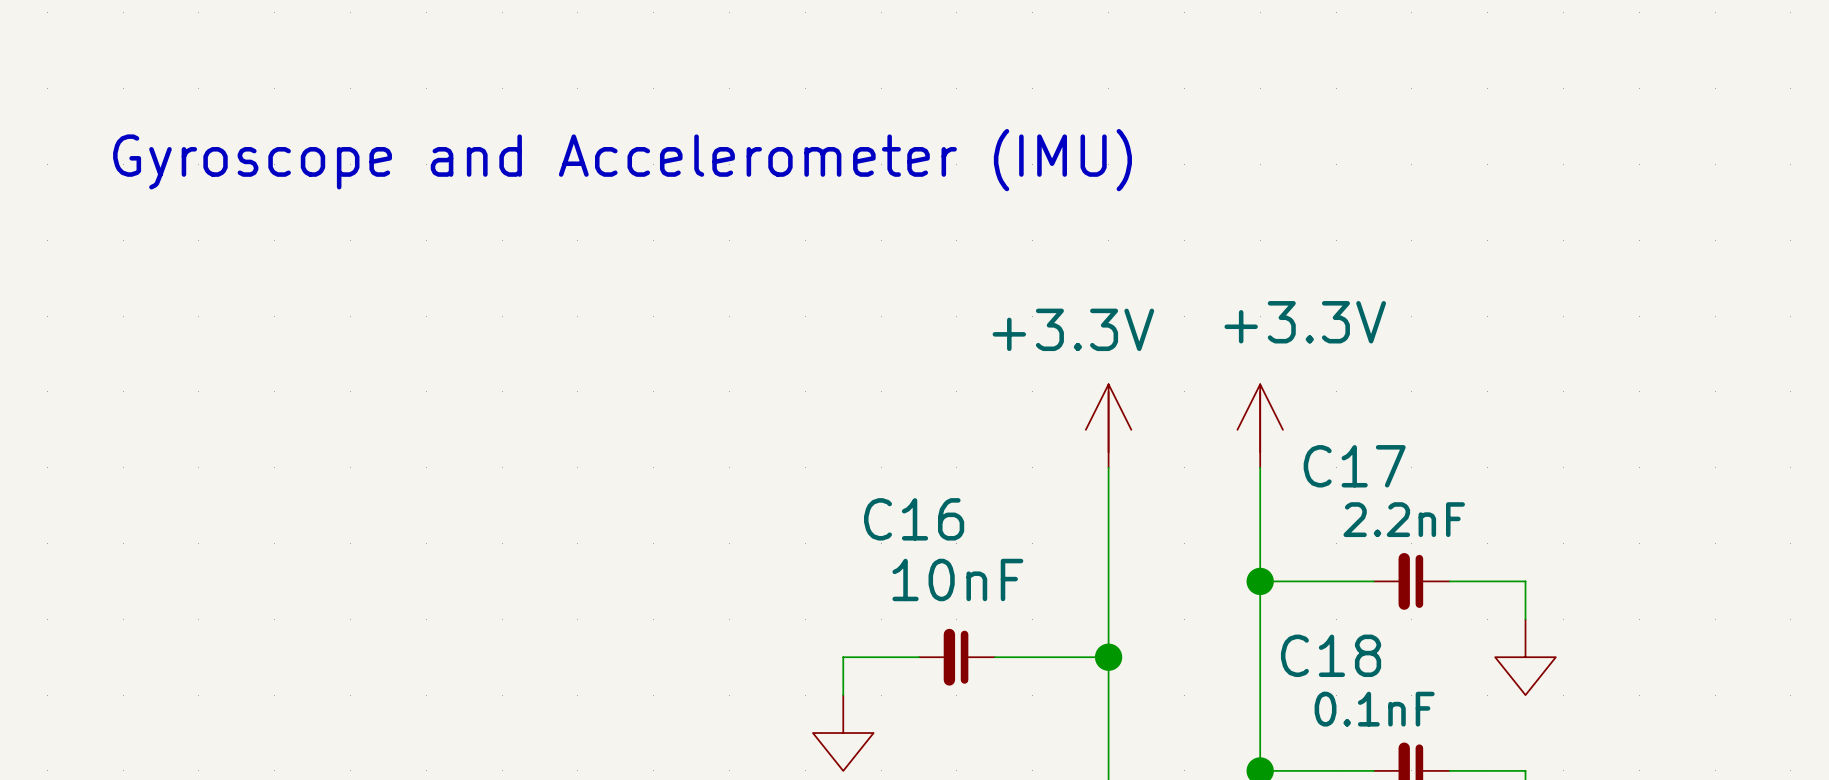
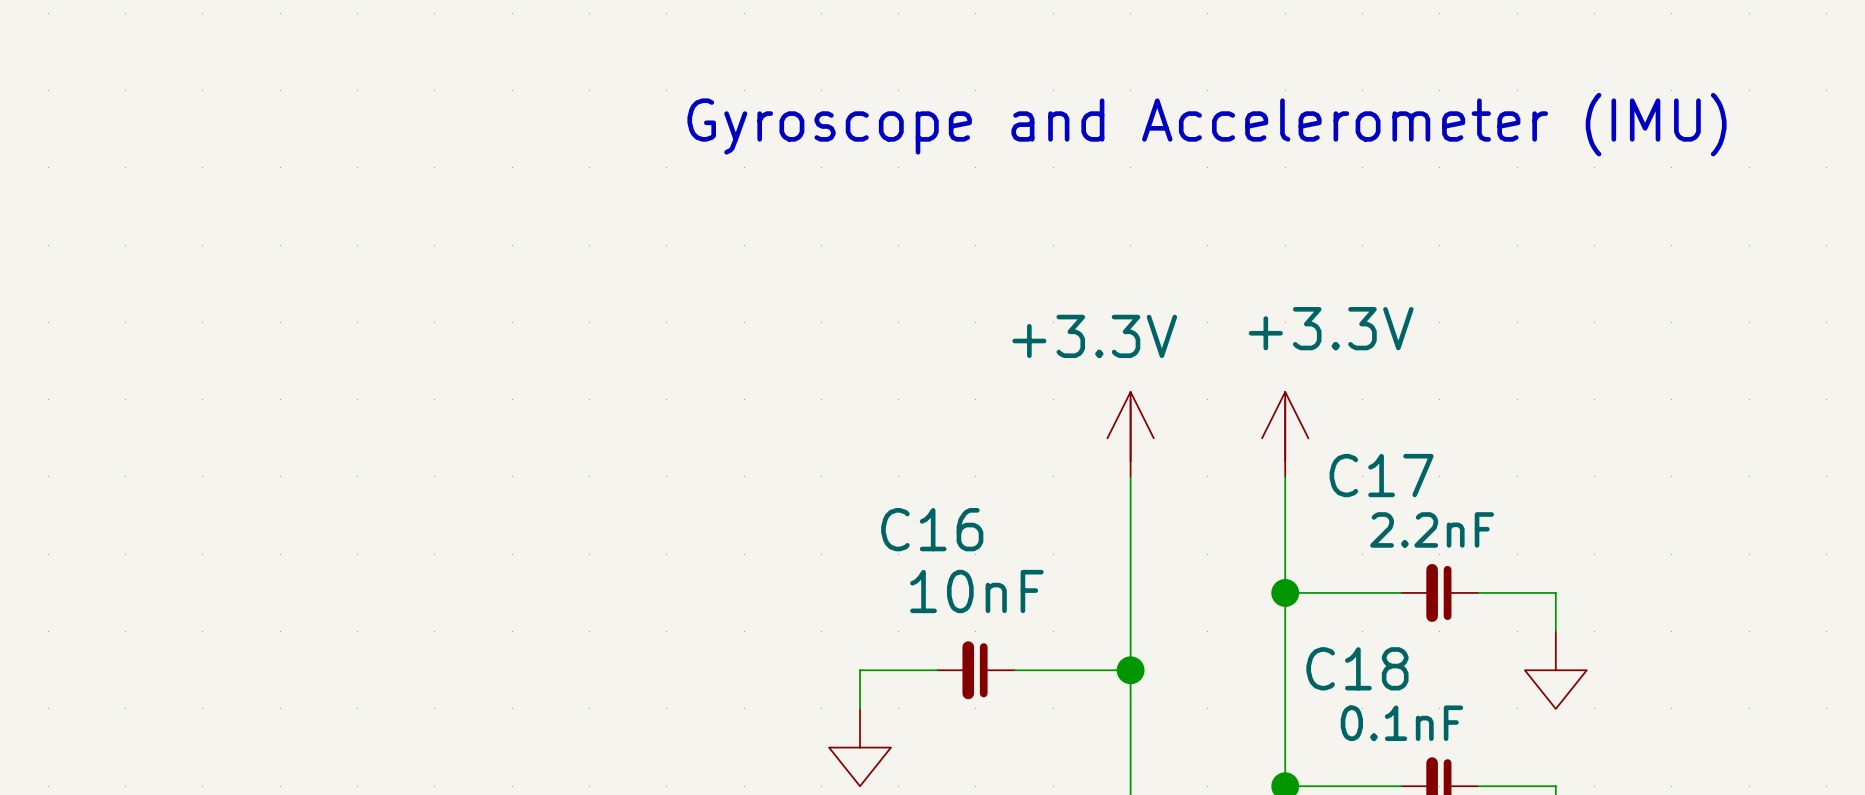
text position: Gyroscope and Accelerometer (IMU) (622, 160) -> Gyroscope and Accelerometer (IMU) (1206, 124)

